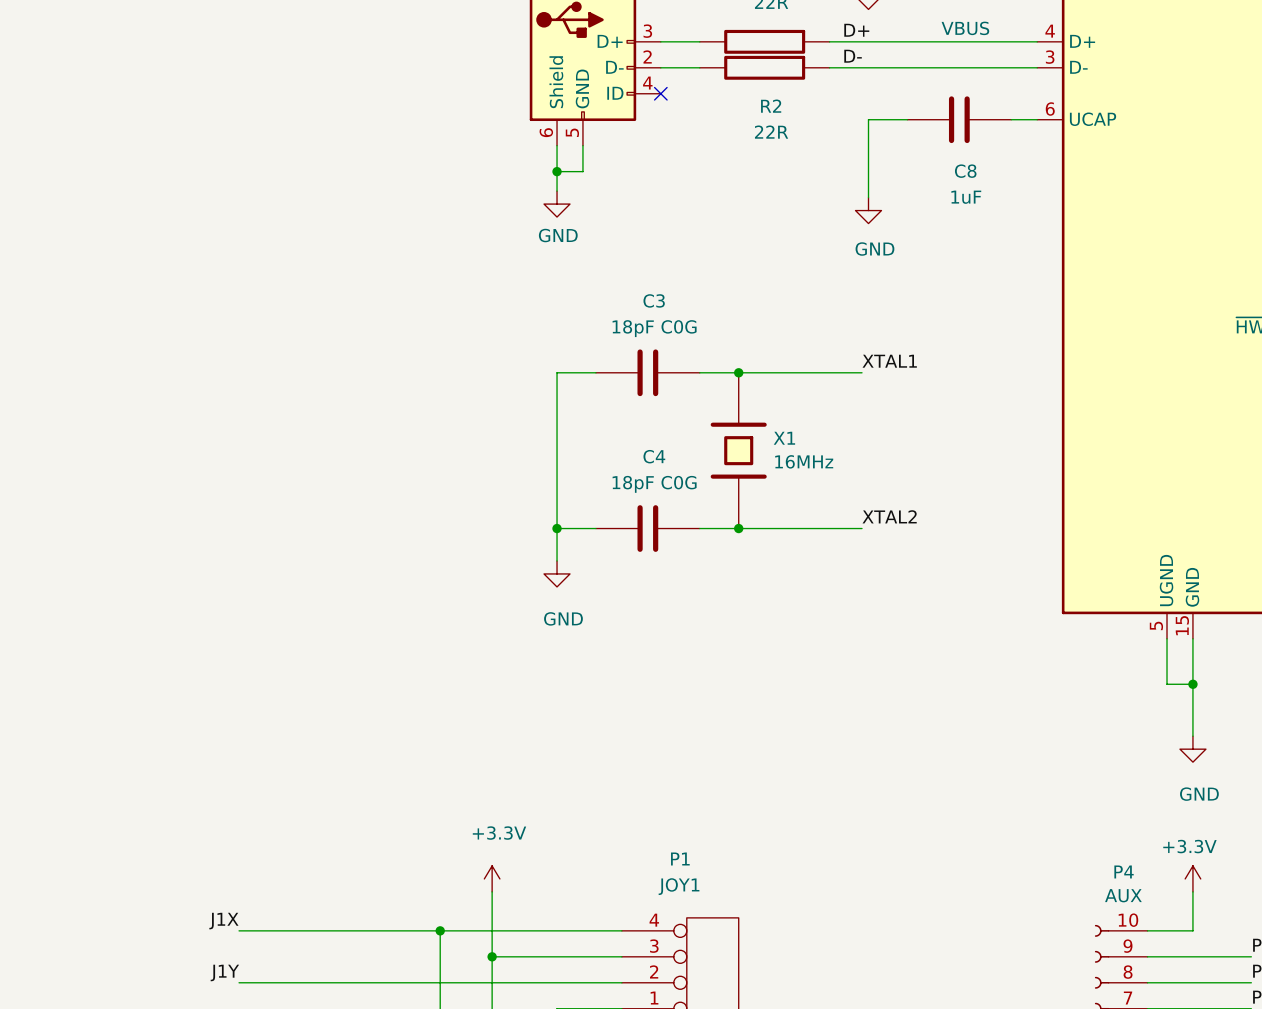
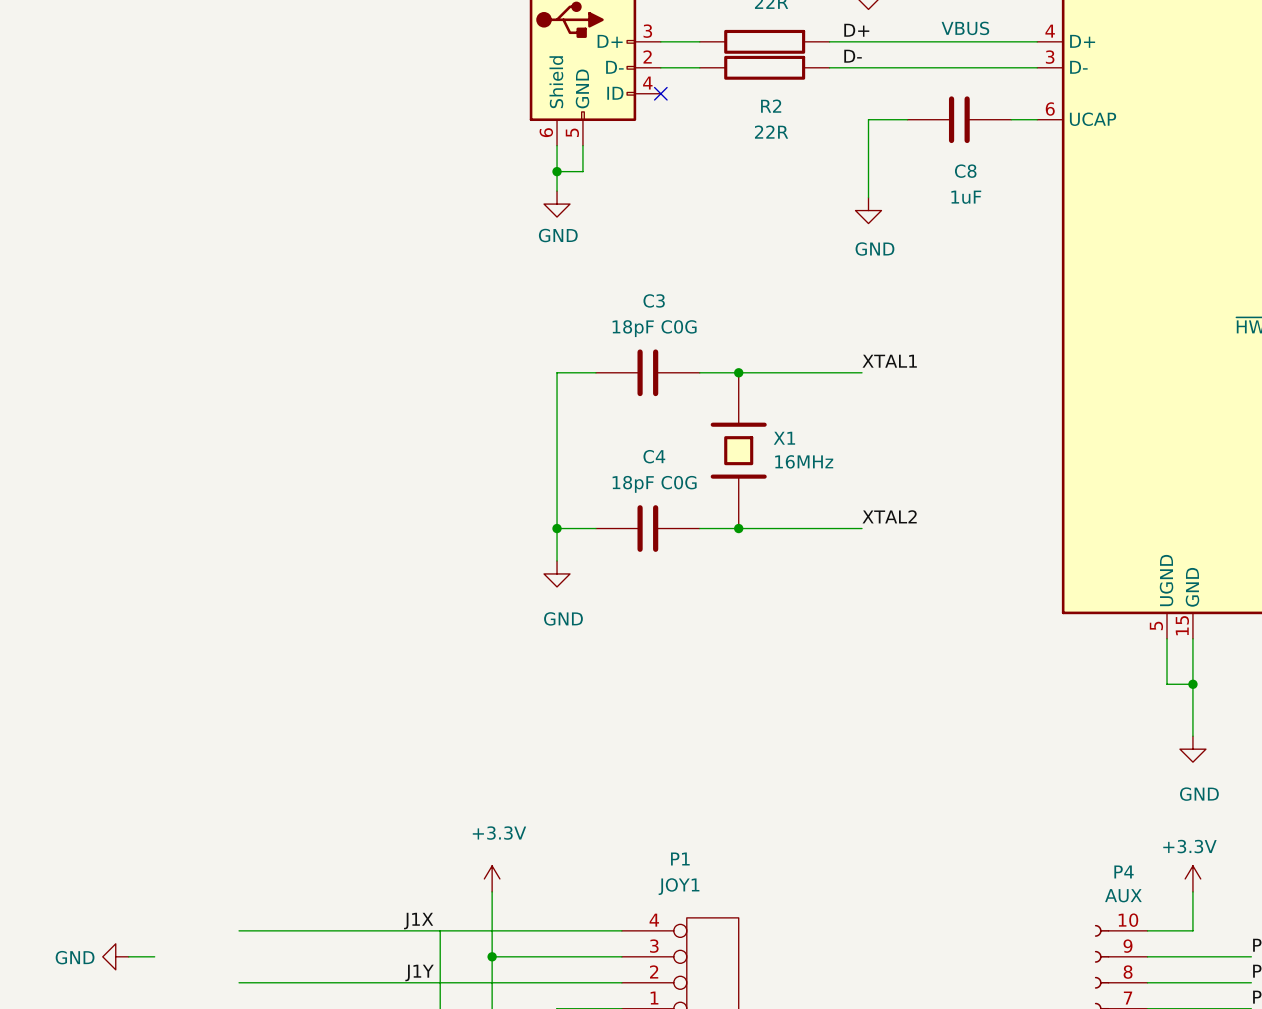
label position: J1X (223, 921) -> J1X (418, 921)
junction: (440, 930) -> none
power symbol: none -> GND (115, 956)
wire: none -> (128, 956) (154, 956)
label position: J1Y (224, 972) -> J1Y (419, 972)

